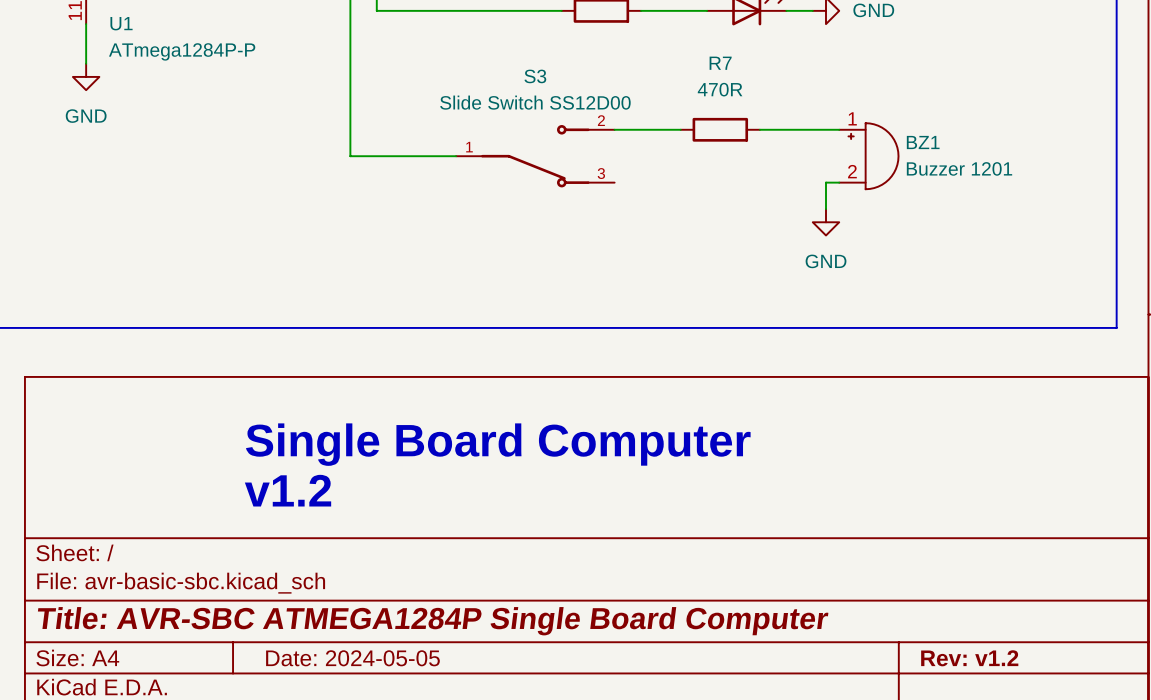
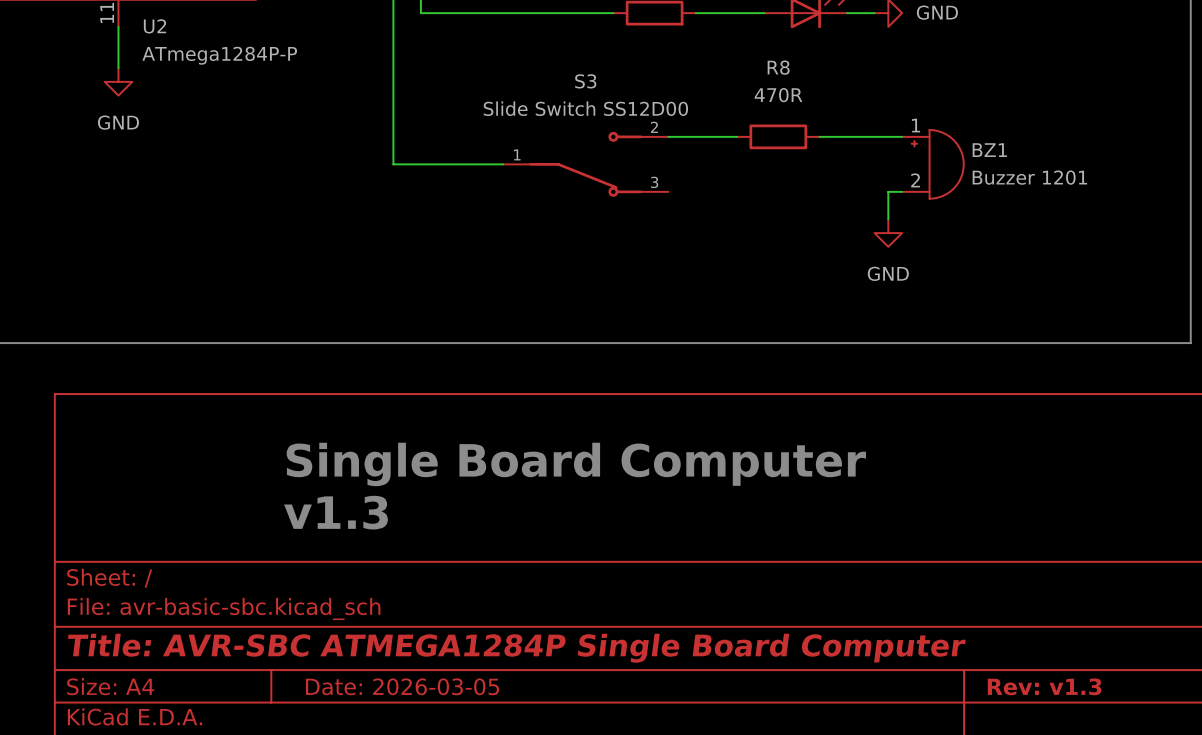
U1 name: U1 (121, 23) -> U2 (155, 26)
R7 name: R7 (720, 63) -> R8 (778, 67)
text: v1.2 (288, 490) -> v1.3 (335, 512)
title block: Date: 2024-05-05 (352, 658) -> Date: 2026-03-05 (402, 686)
title block: Rev: v1.2 (969, 658) -> Rev: v1.3 (1044, 686)

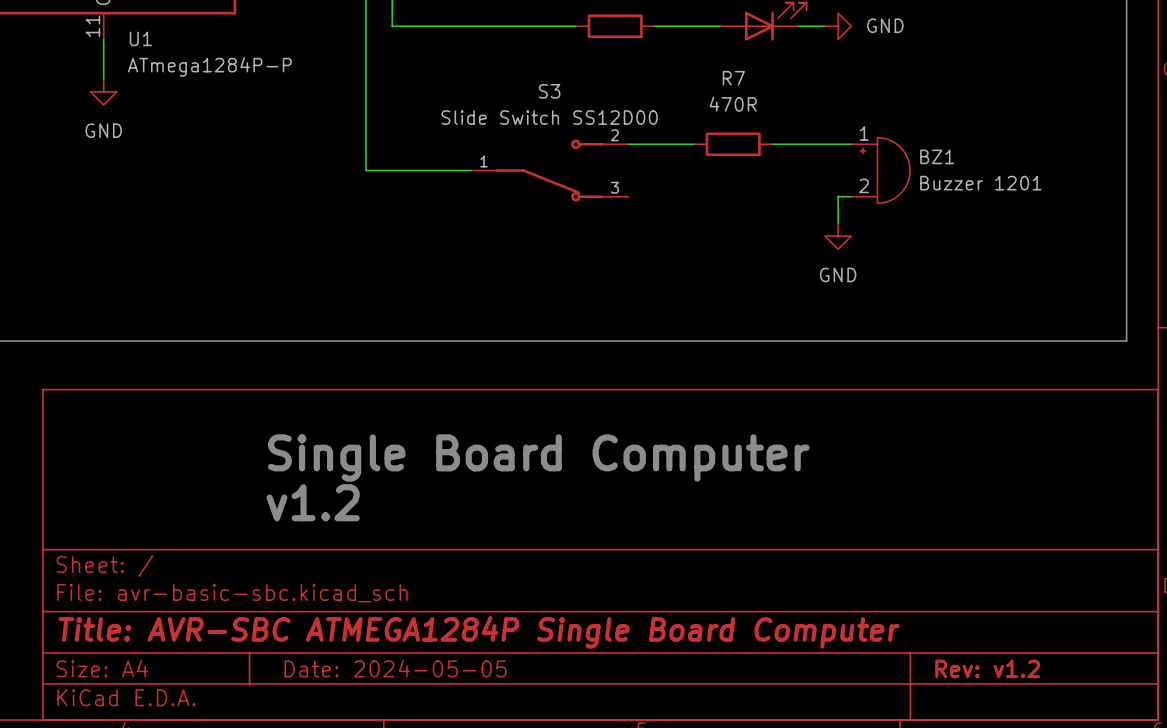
U2 name: U2 (155, 26) -> U1 (140, 38)
R8 name: R8 (778, 67) -> R7 (733, 78)
text: v1.3 (335, 512) -> v1.2 (313, 502)
title block: Date: 2026-03-05 (402, 686) -> Date: 2024-05-05 (395, 668)
title block: Rev: v1.3 (1044, 686) -> Rev: v1.2 (987, 668)

